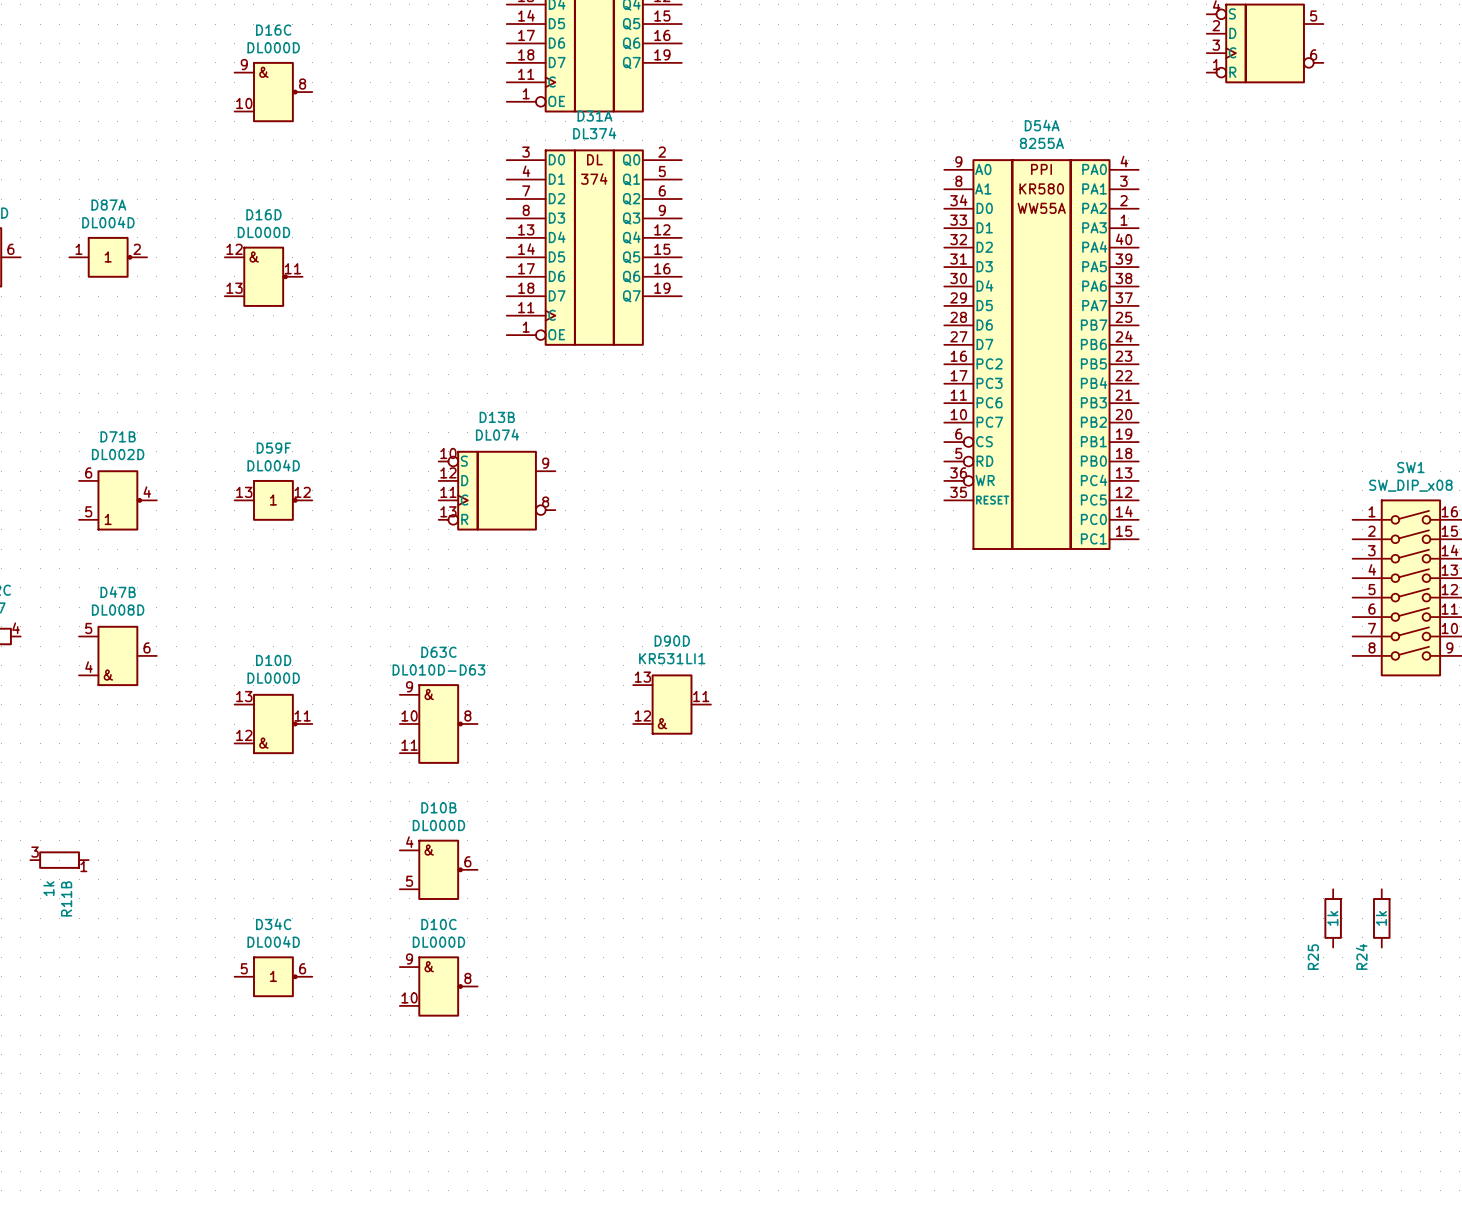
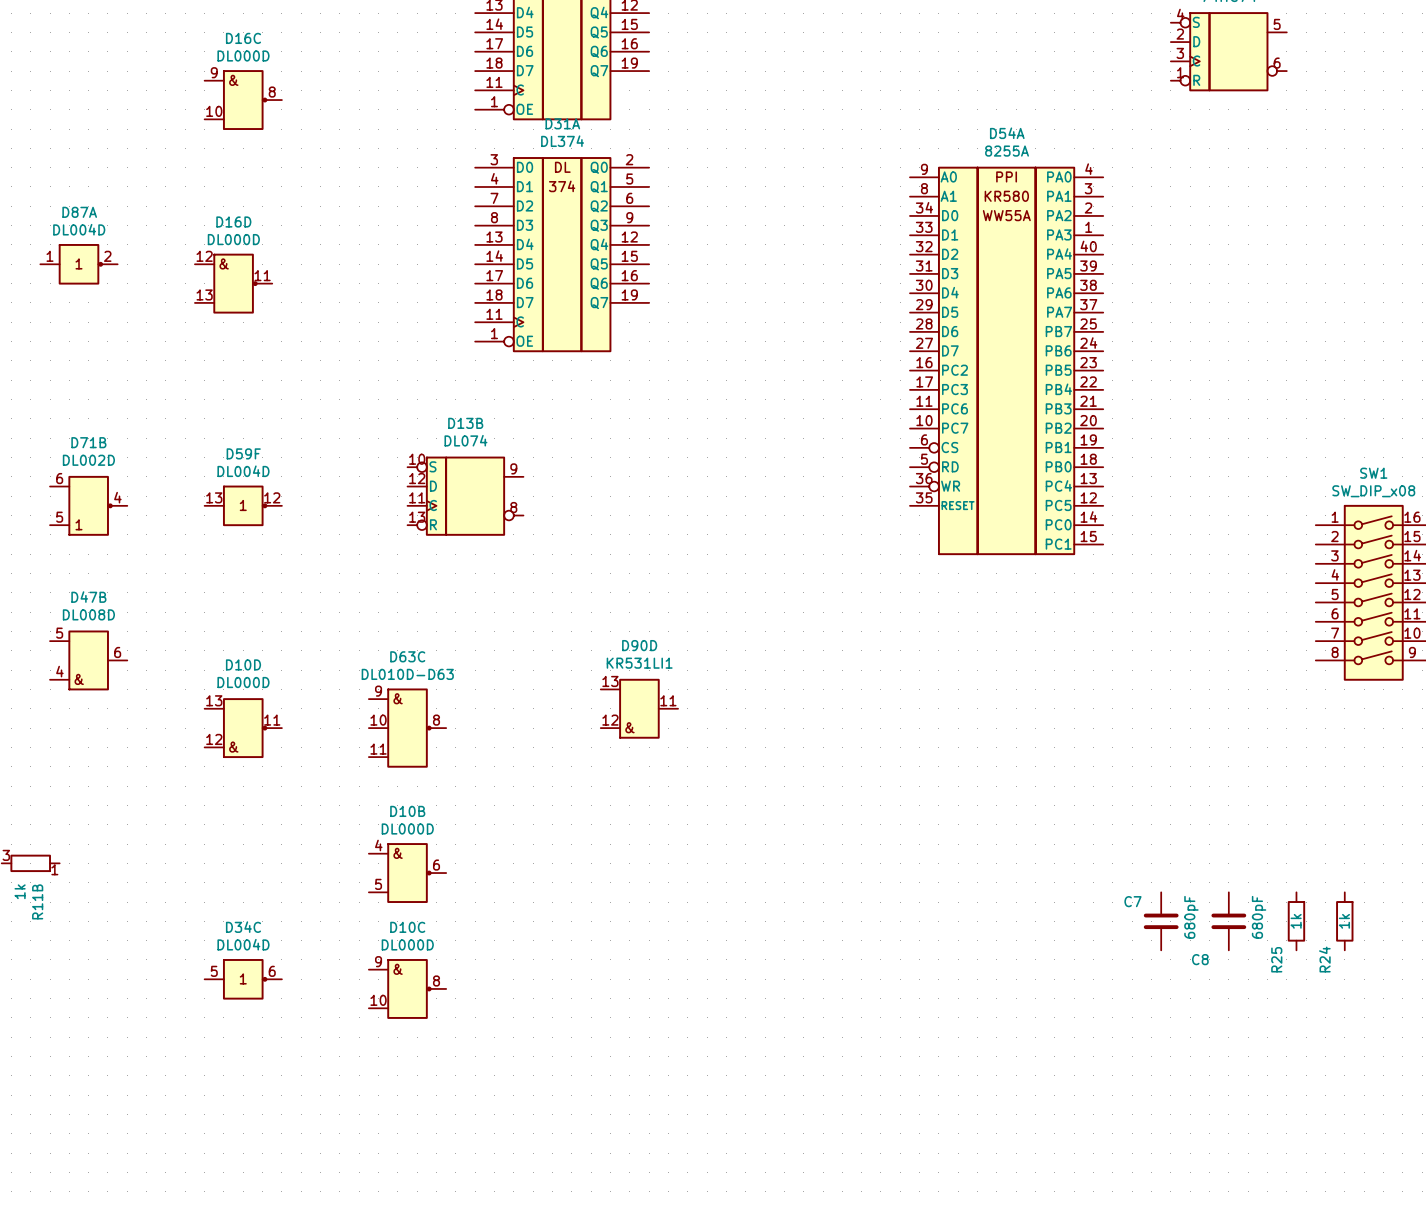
C7: none -> 680pF (1161, 921)
C8: none -> 680pF (1228, 921)

